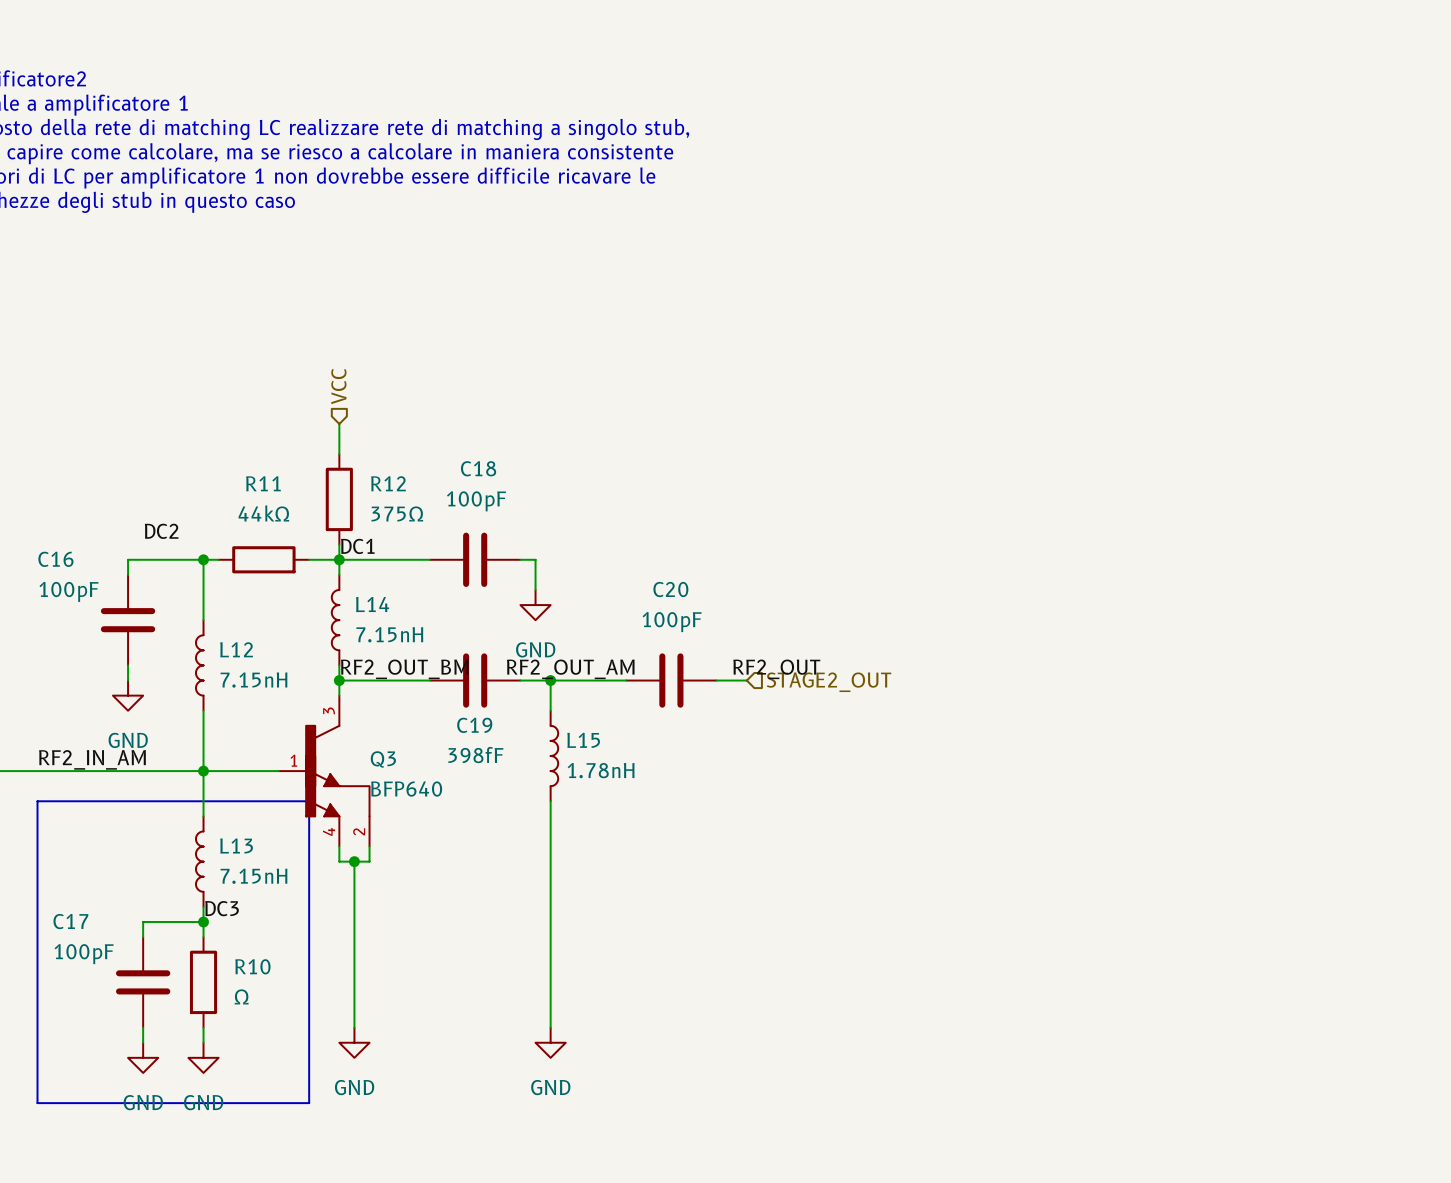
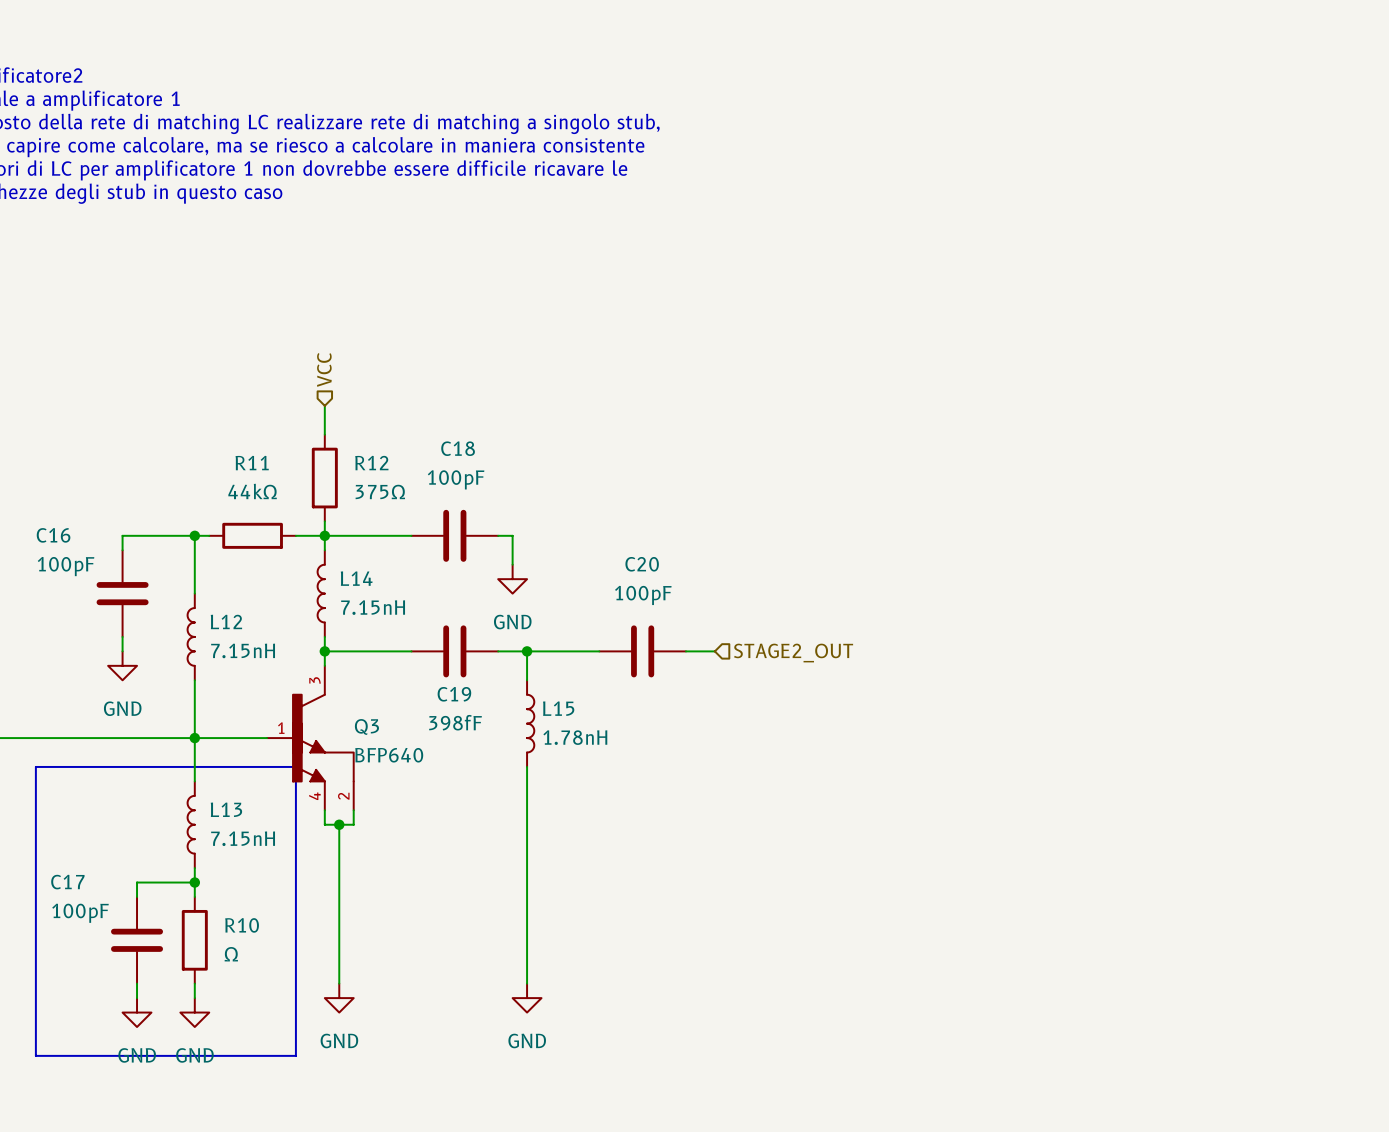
label: DC2 (161, 531) -> none
label: DC1 (357, 546) -> none
label: RF2_OUT_BM (404, 669) -> none
label: RF2_OUT_AM (570, 669) -> none
label: RF2_OUT (776, 669) -> none
label: RF2_IN_AM (92, 759) -> none
label: DC3 (222, 908) -> none

